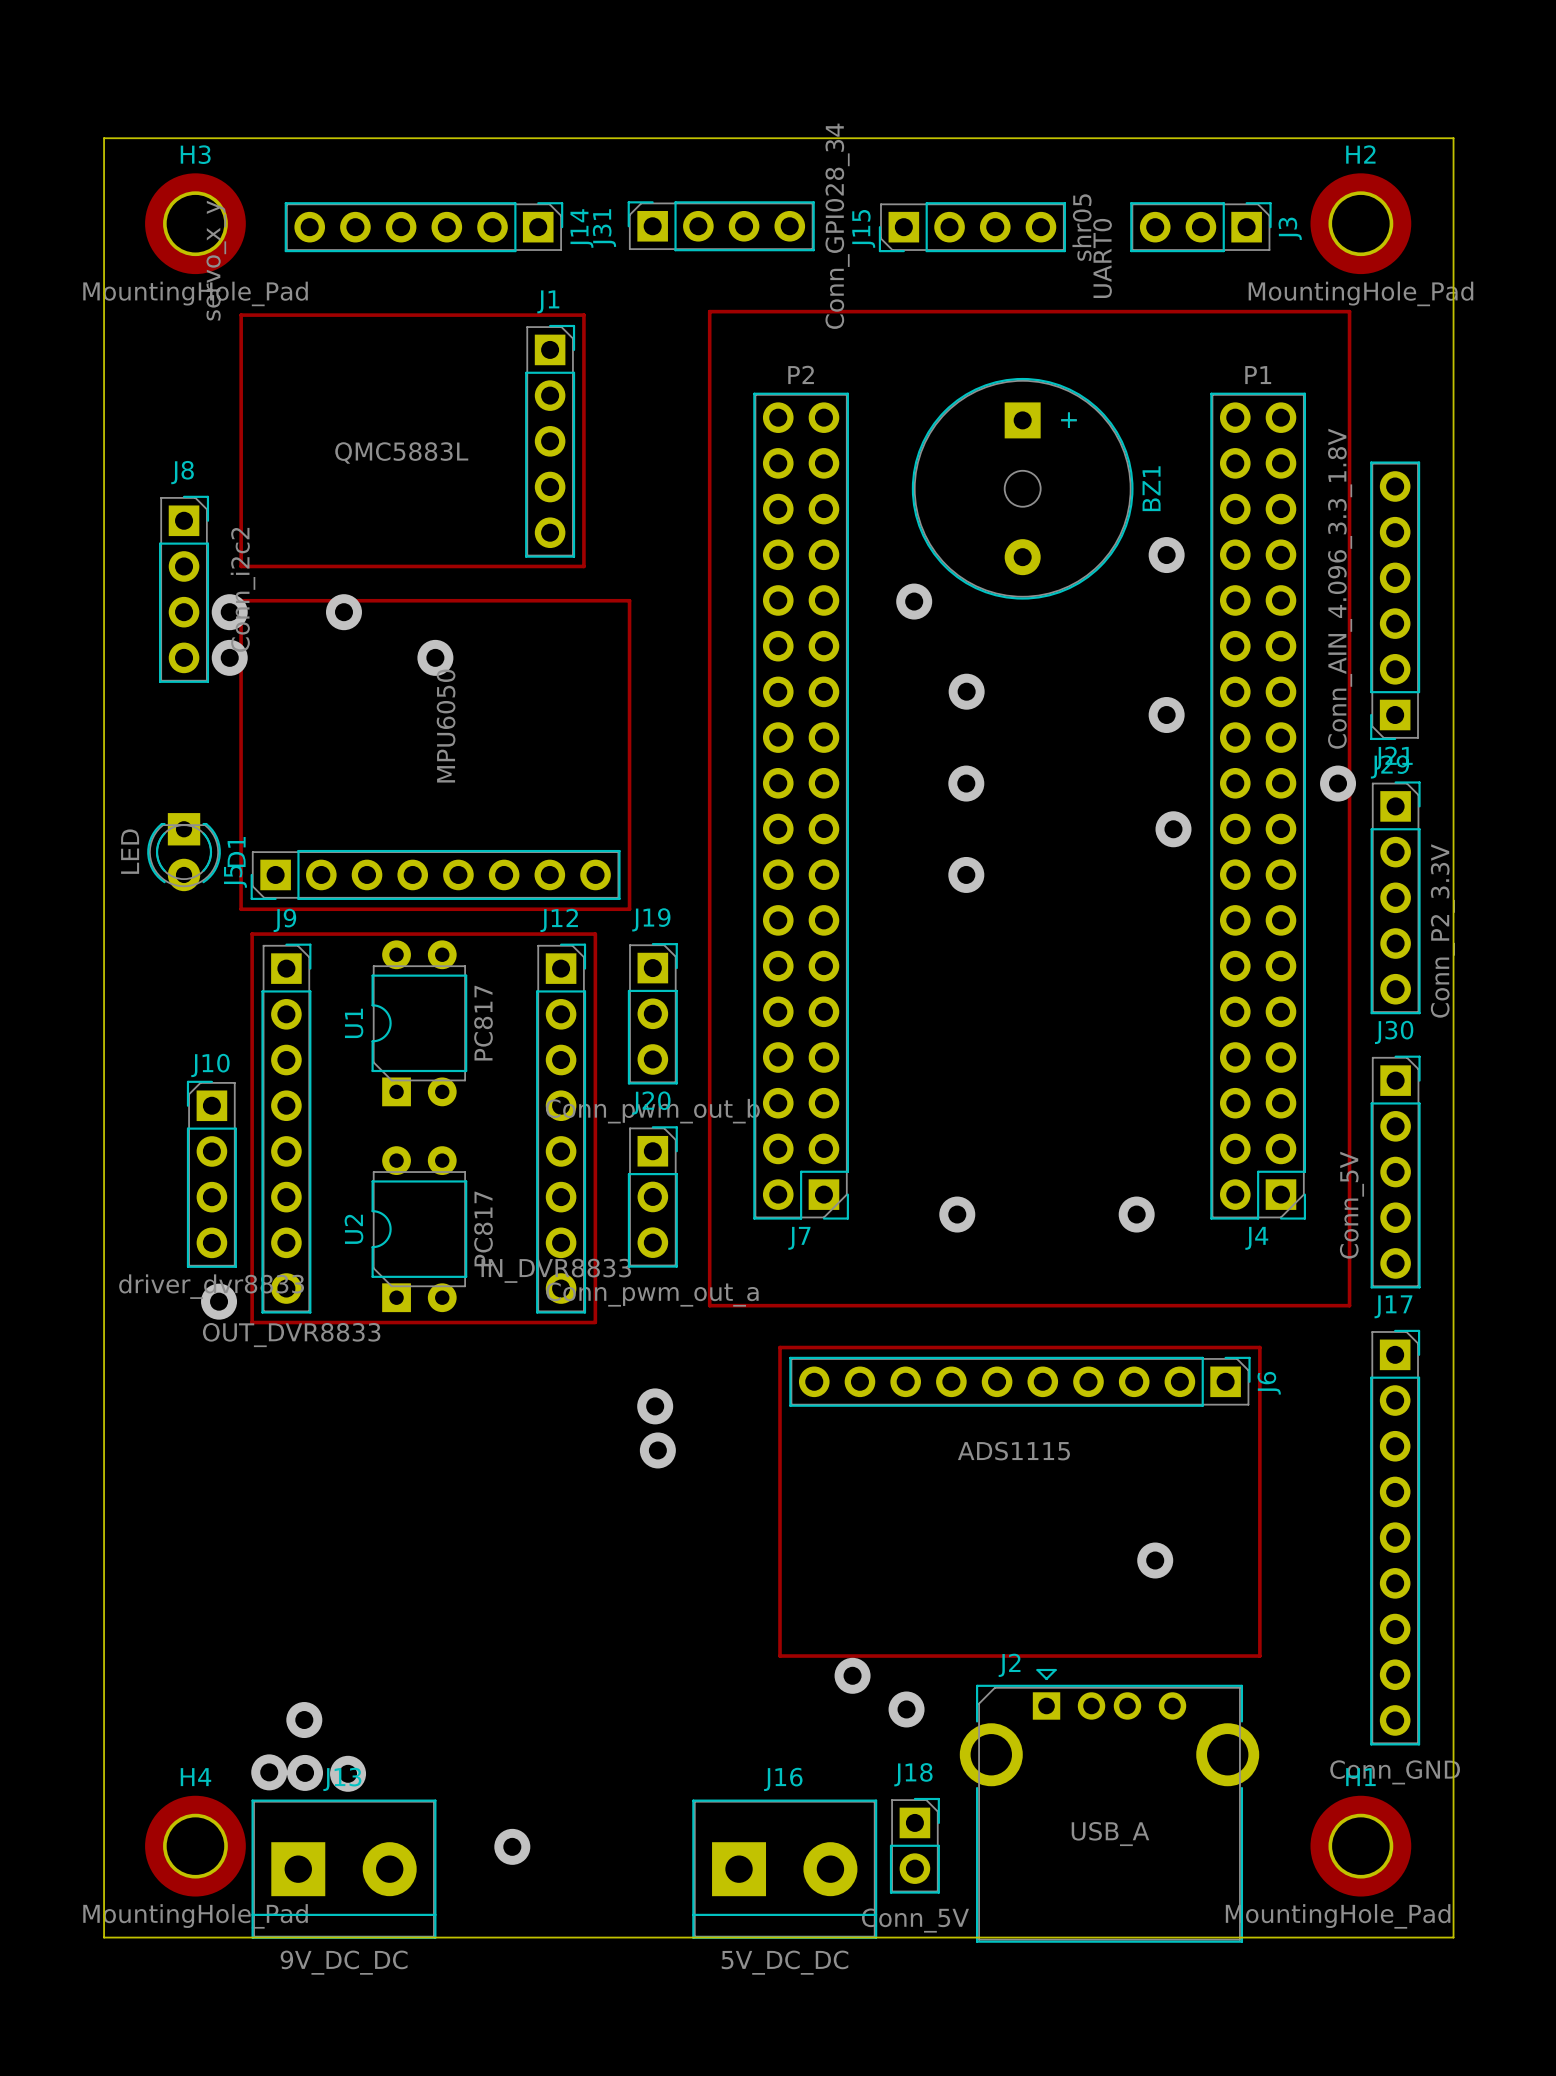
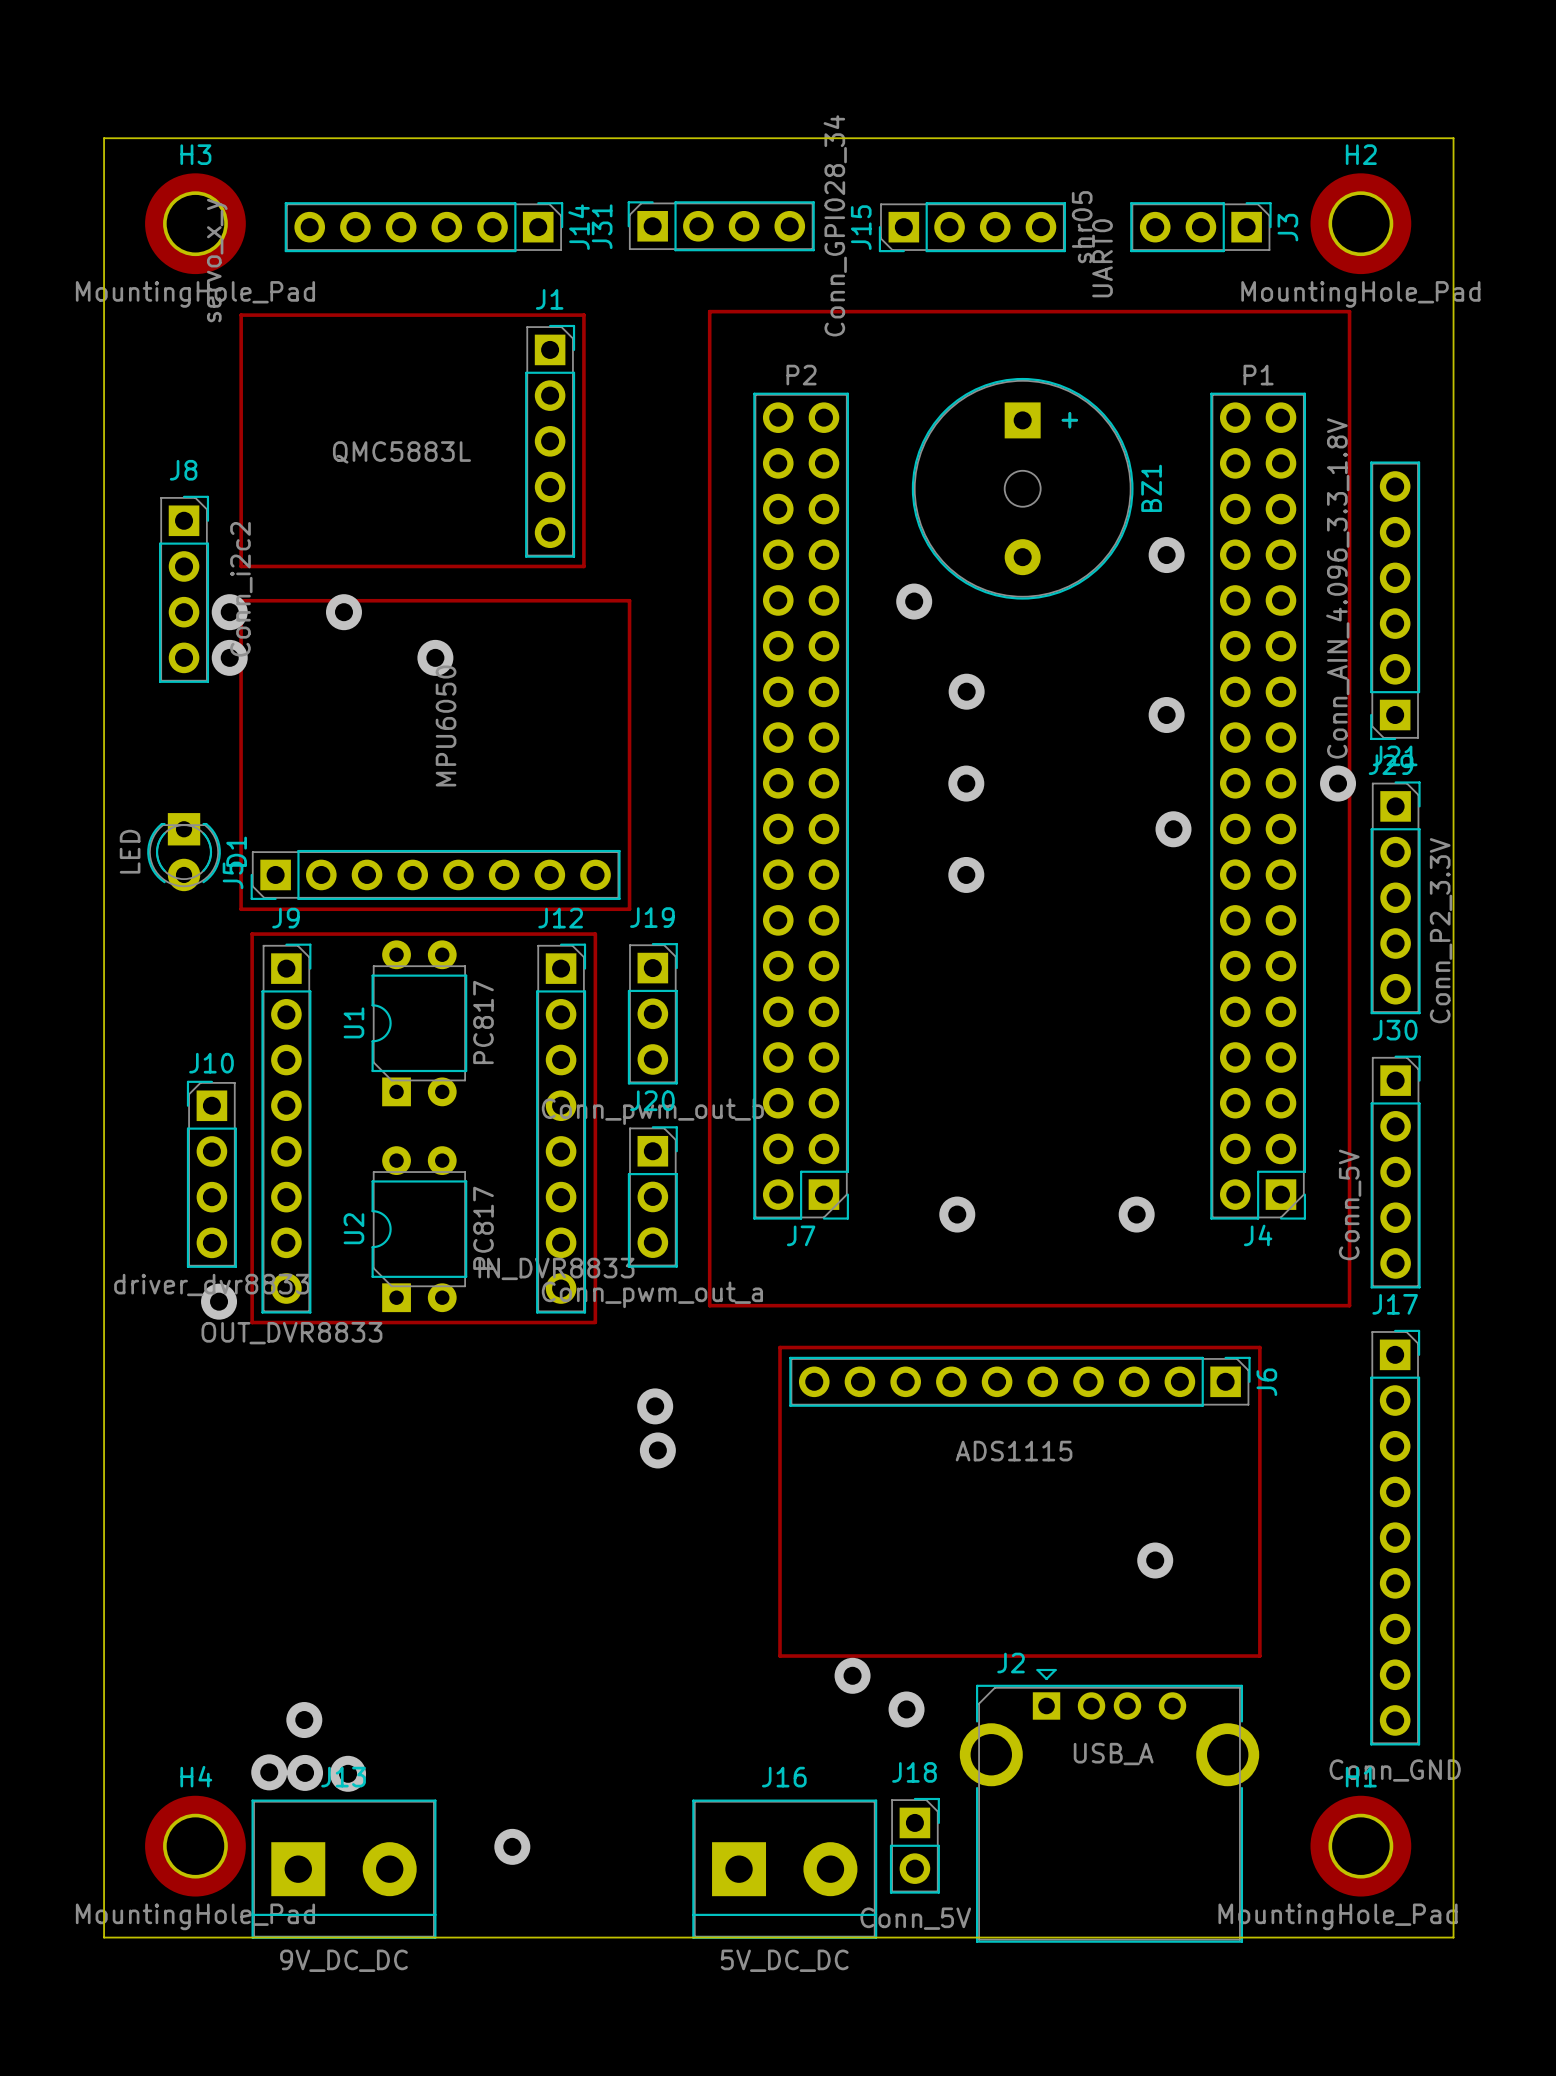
J2 value position: USB_A (1110, 1834) -> USB_A (1113, 1754)

